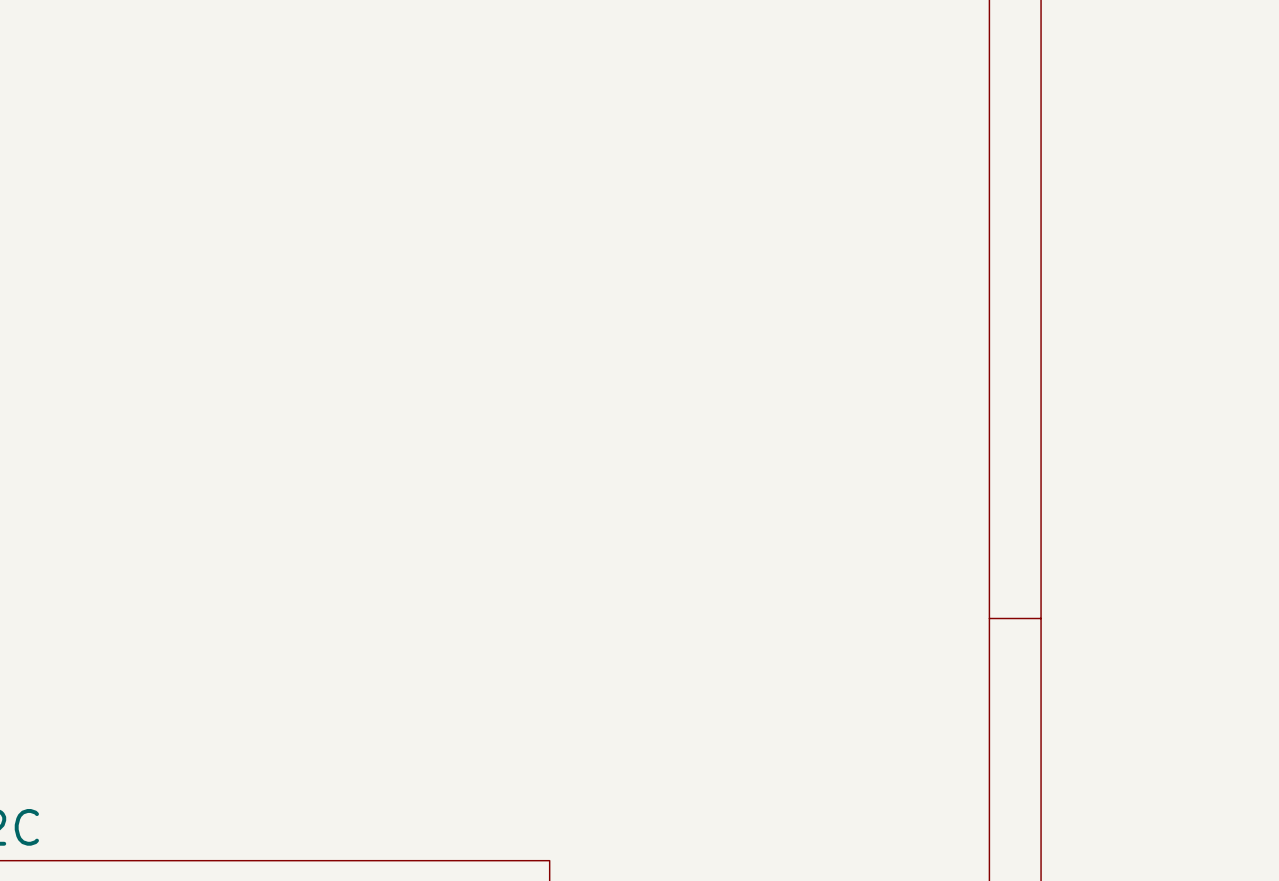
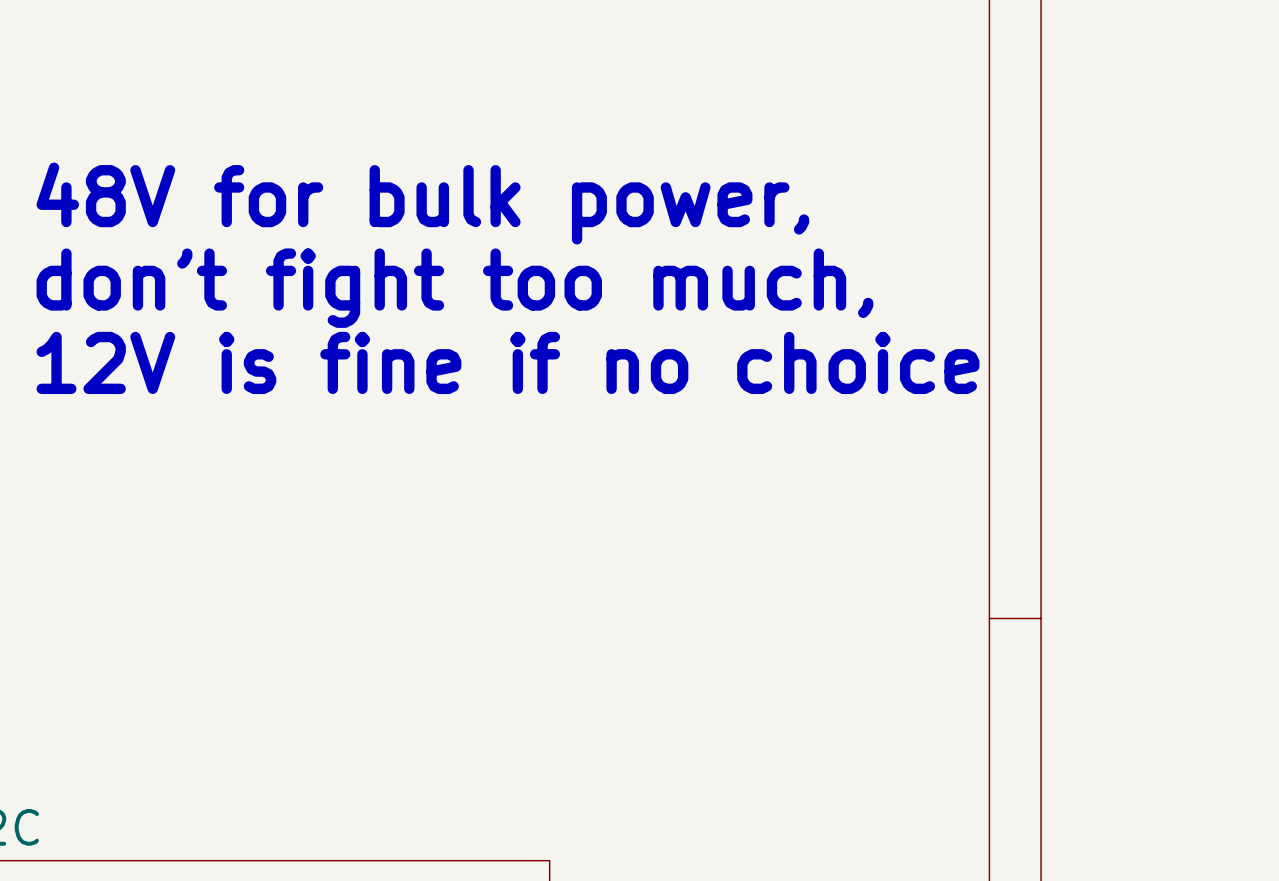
text: none -> 48V for bulk power, (422, 203)
text: none -> don’t fight too much, (454, 288)
text: none -> 12V is fine if no choice (507, 362)

